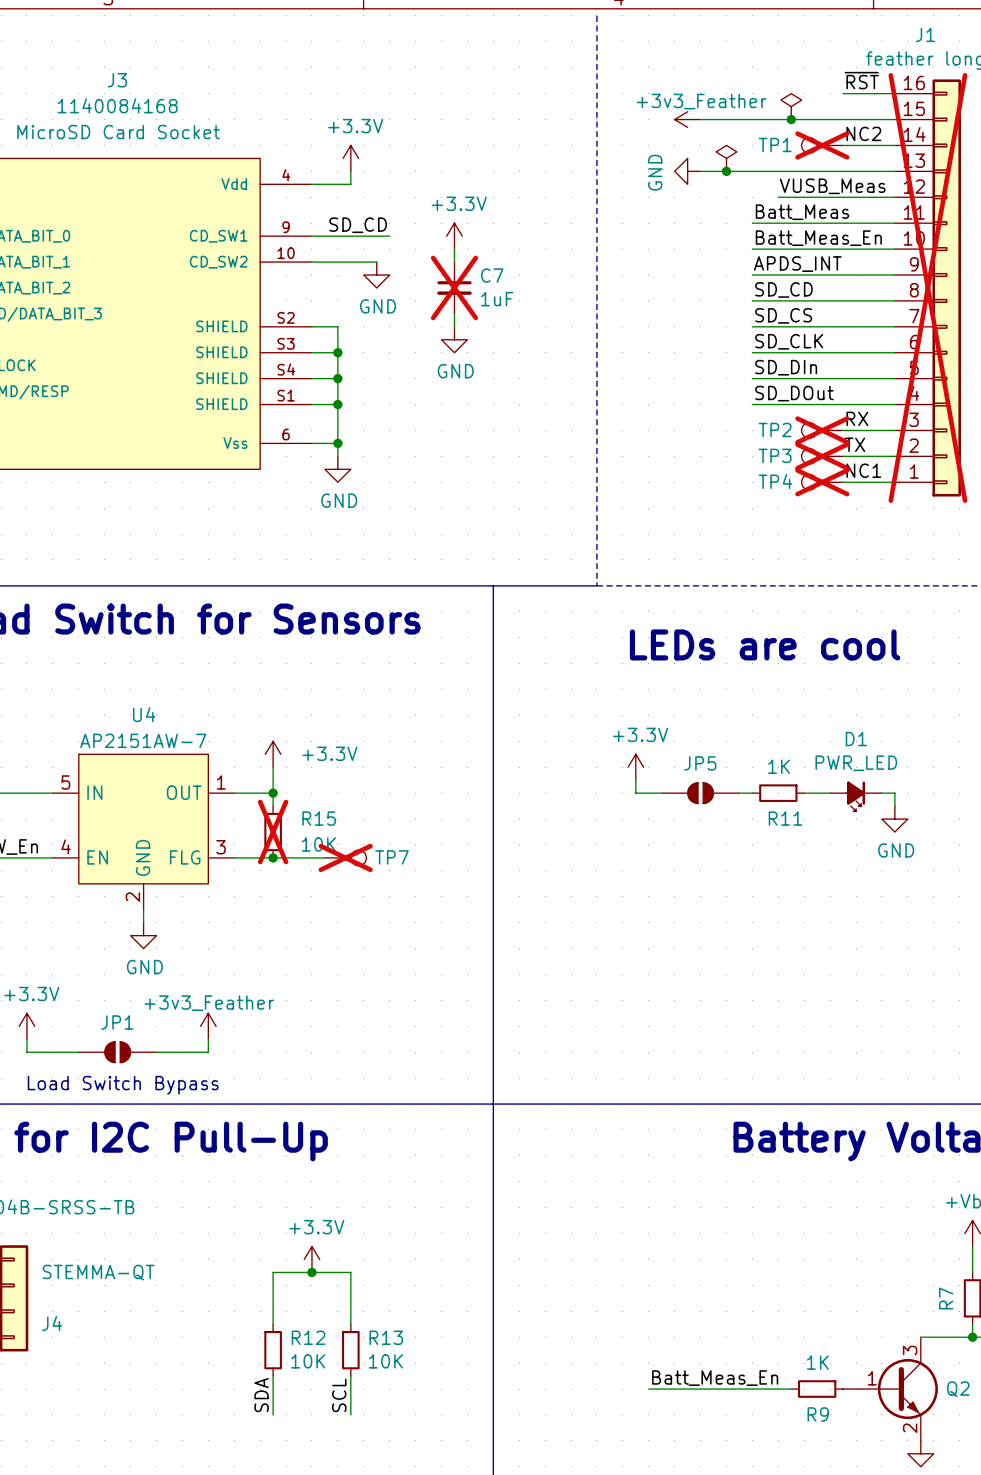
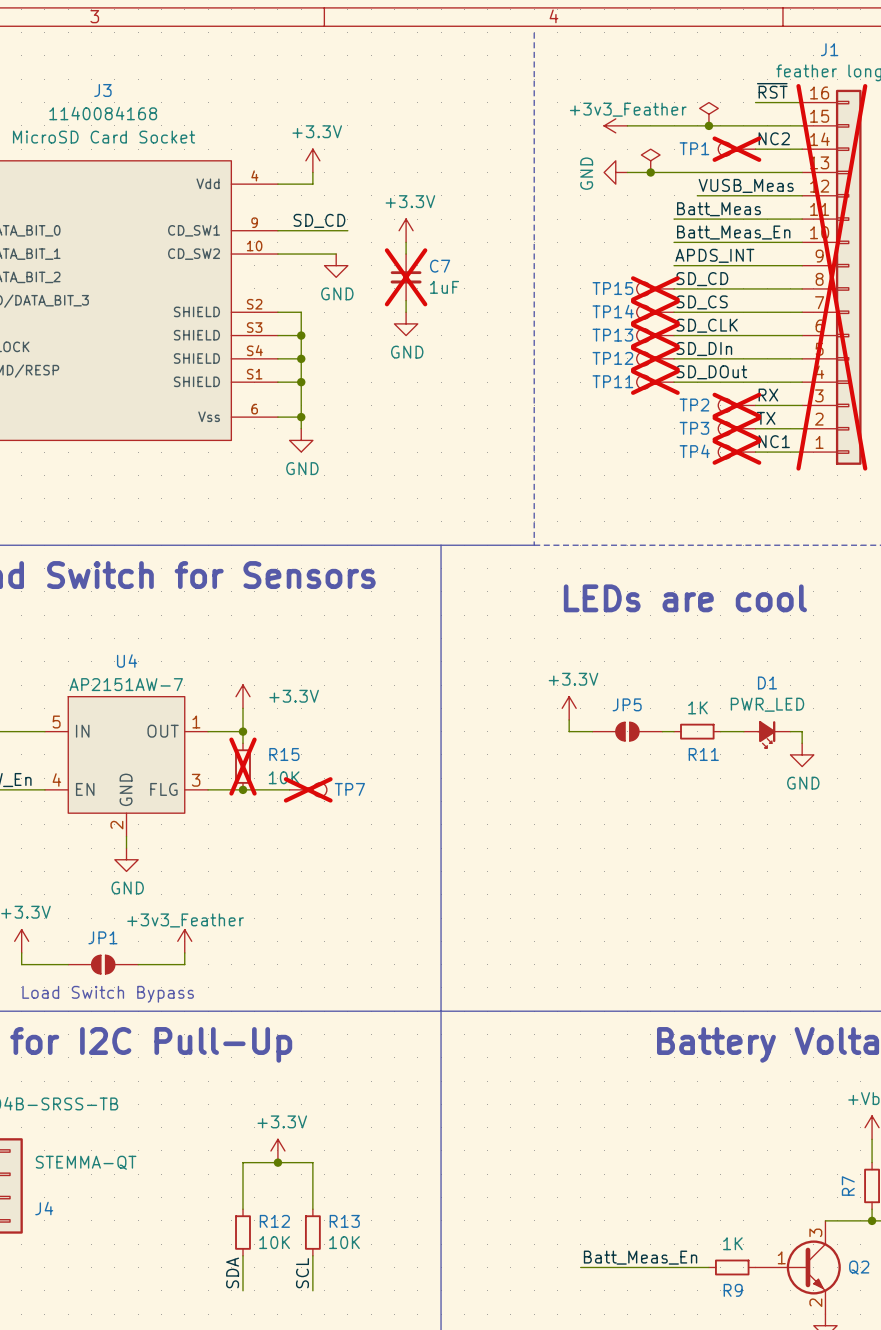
TP15: none -> (655, 288)
TP14: none -> (655, 312)
TP13: none -> (655, 335)
TP12: none -> (655, 358)
TP11: none -> (655, 382)

